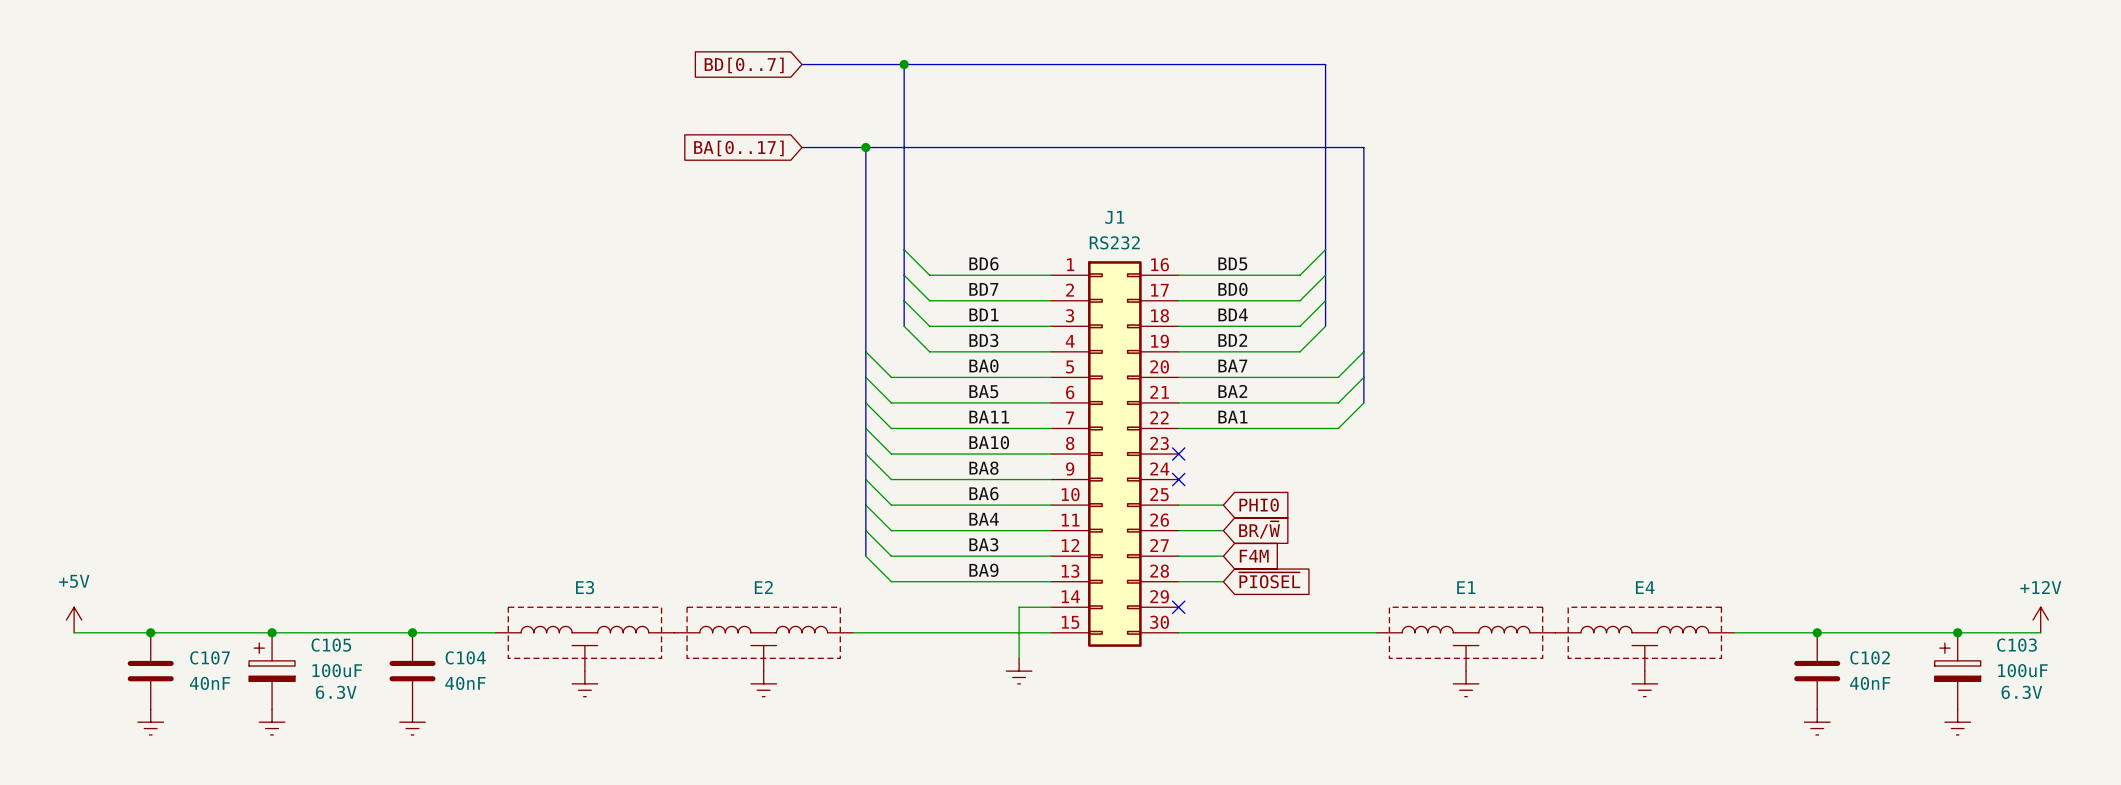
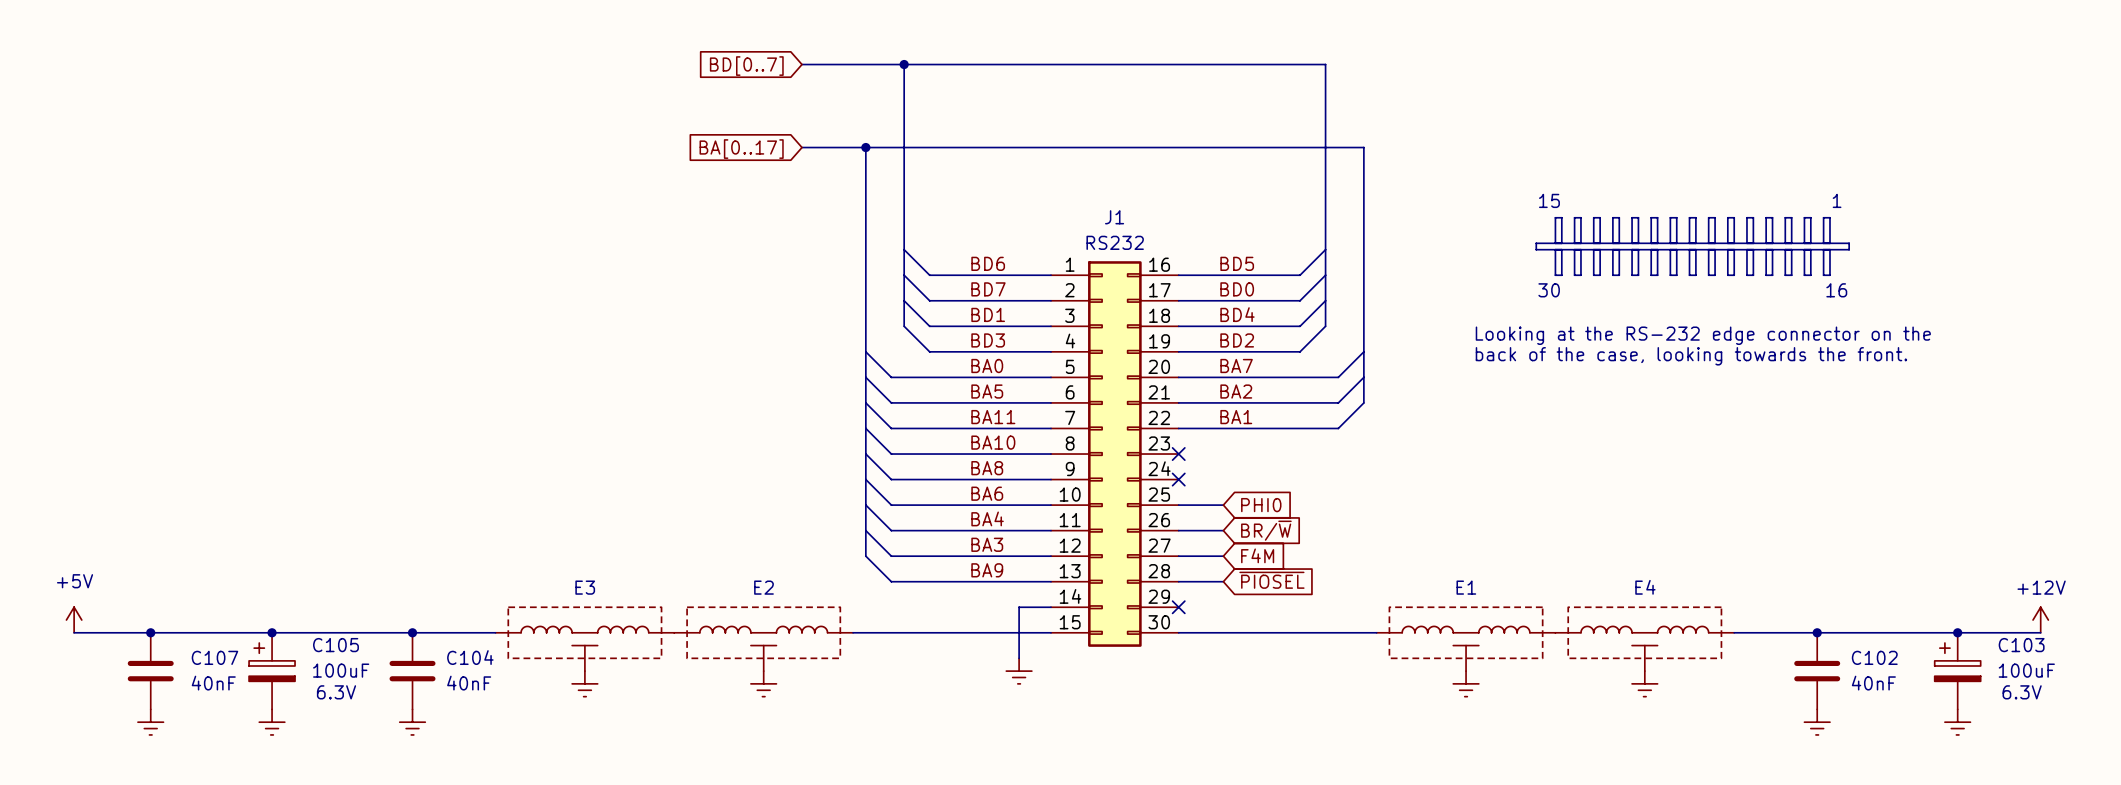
text: none -> 1 (1837, 200)
text: none -> 15 (1549, 200)
line: none -> (1536, 243) (1849, 243) (1849, 249) (1536, 249) (1536, 243)
line: none -> (1555, 243) (1555, 217) (1561, 217) (1561, 243)
line: none -> (1574, 243) (1574, 217) (1580, 217) (1580, 243)
line: none -> (1593, 243) (1593, 217) (1600, 217) (1600, 243)
line: none -> (1612, 243) (1612, 217) (1619, 217) (1619, 243)
line: none -> (1632, 243) (1632, 217) (1638, 217) (1638, 243)
line: none -> (1651, 243) (1651, 217) (1657, 217) (1657, 243)
line: none -> (1670, 243) (1670, 217) (1676, 217) (1676, 243)
line: none -> (1689, 243) (1689, 217) (1695, 217) (1695, 243)
line: none -> (1708, 243) (1708, 217) (1715, 217) (1715, 243)
line: none -> (1727, 243) (1727, 217) (1734, 217) (1734, 243)
line: none -> (1746, 243) (1746, 217) (1753, 217) (1753, 243)
line: none -> (1766, 243) (1766, 217) (1772, 217) (1772, 243)
line: none -> (1785, 243) (1785, 217) (1791, 217) (1791, 243)
line: none -> (1804, 243) (1804, 217) (1810, 217) (1810, 243)
line: none -> (1823, 243) (1823, 217) (1829, 217) (1829, 243)
line: none -> (1555, 249) (1555, 275) (1561, 275) (1561, 249)
line: none -> (1574, 249) (1574, 275) (1580, 275) (1580, 249)
line: none -> (1593, 249) (1593, 275) (1600, 275) (1600, 249)
line: none -> (1612, 249) (1612, 275) (1619, 275) (1619, 249)
line: none -> (1632, 249) (1632, 275) (1638, 275) (1638, 249)
line: none -> (1651, 249) (1651, 275) (1657, 275) (1657, 249)
line: none -> (1670, 249) (1670, 275) (1676, 275) (1676, 249)
line: none -> (1689, 249) (1689, 275) (1695, 275) (1695, 249)
line: none -> (1708, 249) (1708, 275) (1715, 275) (1715, 249)
line: none -> (1727, 249) (1727, 275) (1734, 275) (1734, 249)
line: none -> (1746, 249) (1746, 275) (1753, 275) (1753, 249)
line: none -> (1766, 249) (1766, 275) (1772, 275) (1772, 249)
line: none -> (1785, 249) (1785, 275) (1791, 275) (1791, 249)
line: none -> (1804, 249) (1804, 275) (1810, 275) (1810, 249)
line: none -> (1823, 249) (1823, 275) (1829, 275) (1829, 249)
text: none -> 30 (1549, 290)
text: none -> 16 (1836, 290)
text: none -> Looking at the RS-232 edge connector on the (1703, 335)
text: none -> back of the case, looking towards the front. (1691, 356)

